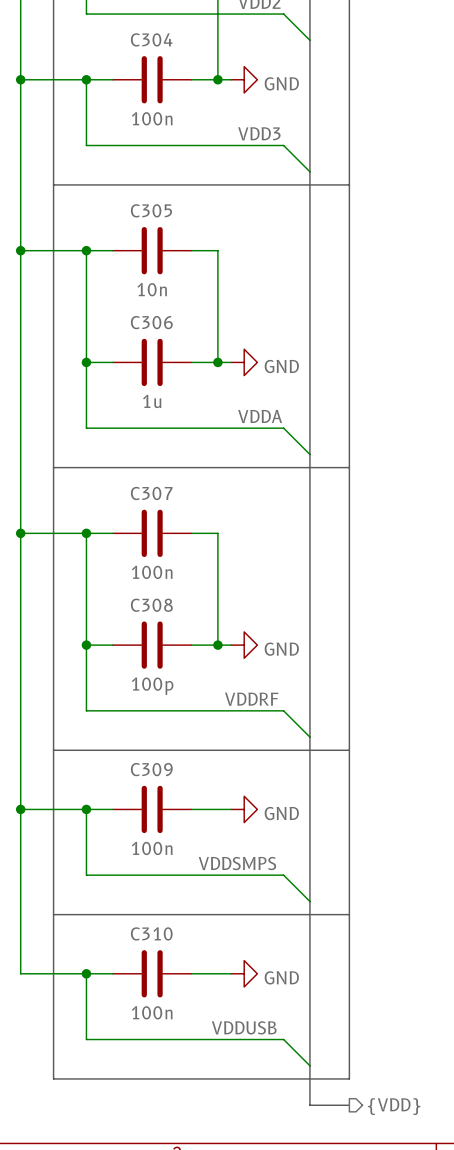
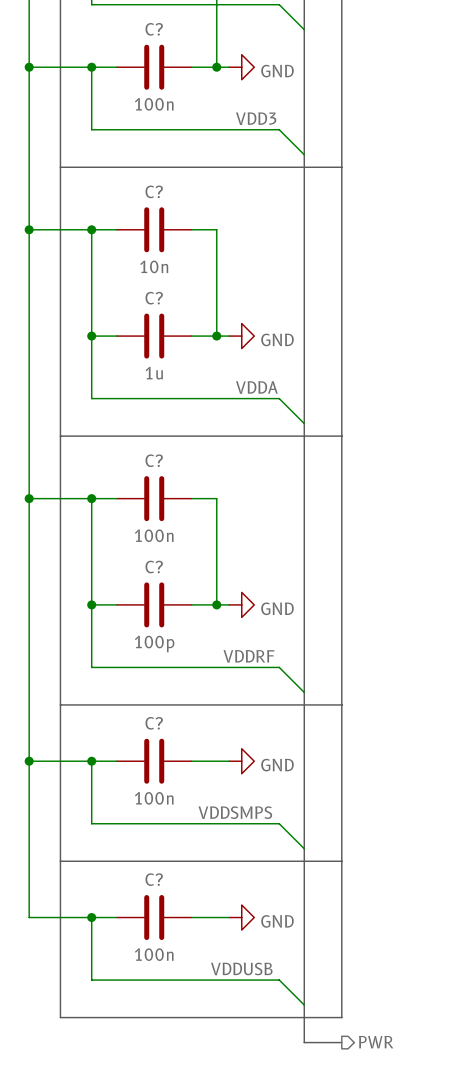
C304 name: C304 (151, 39) -> C? (154, 29)
C305 name: C305 (151, 210) -> C? (154, 191)
C306 name: C306 (151, 322) -> C? (154, 298)
C307 name: C307 (151, 493) -> C? (154, 460)
C308 name: C308 (151, 605) -> C? (154, 567)
C309 name: C309 (151, 769) -> C? (154, 723)
C310 name: C310 (151, 933) -> C? (154, 879)
hierarchical label: {VDD} (394, 1106) -> PWR (376, 1042)

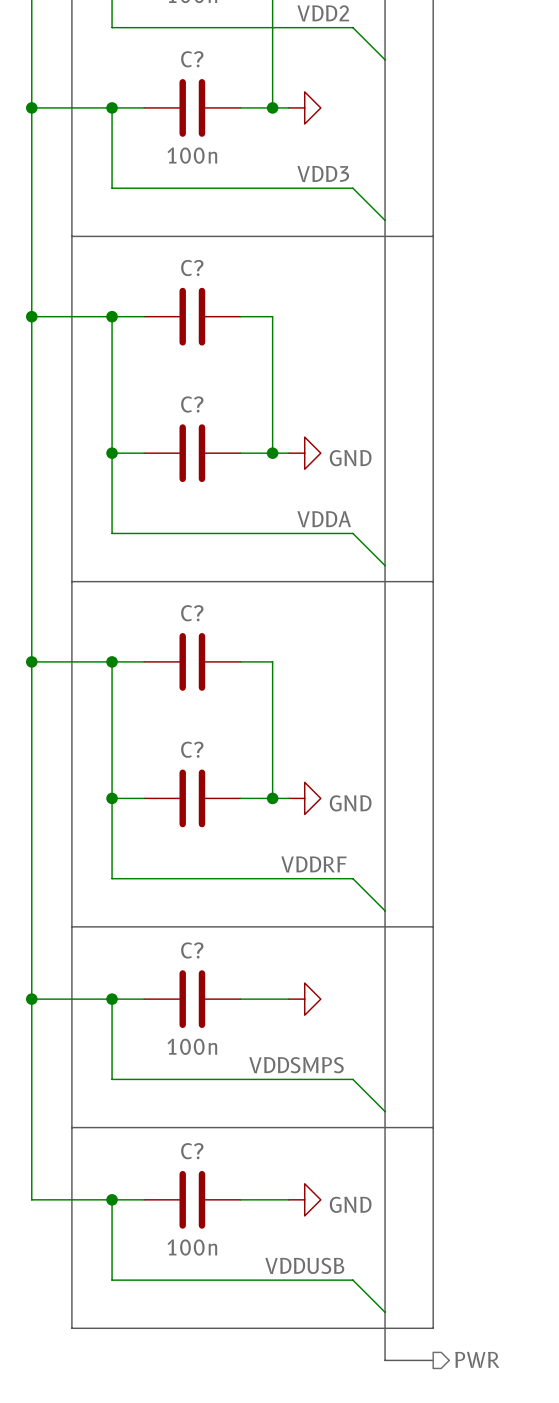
power symbol text: GND (277, 71) -> none
C? value: 10n (154, 266) -> none
C? value: 1u (154, 373) -> none
C? value: 100n (154, 535) -> none
C? value: 100p (154, 644) -> none
power symbol text: GND (277, 765) -> none

